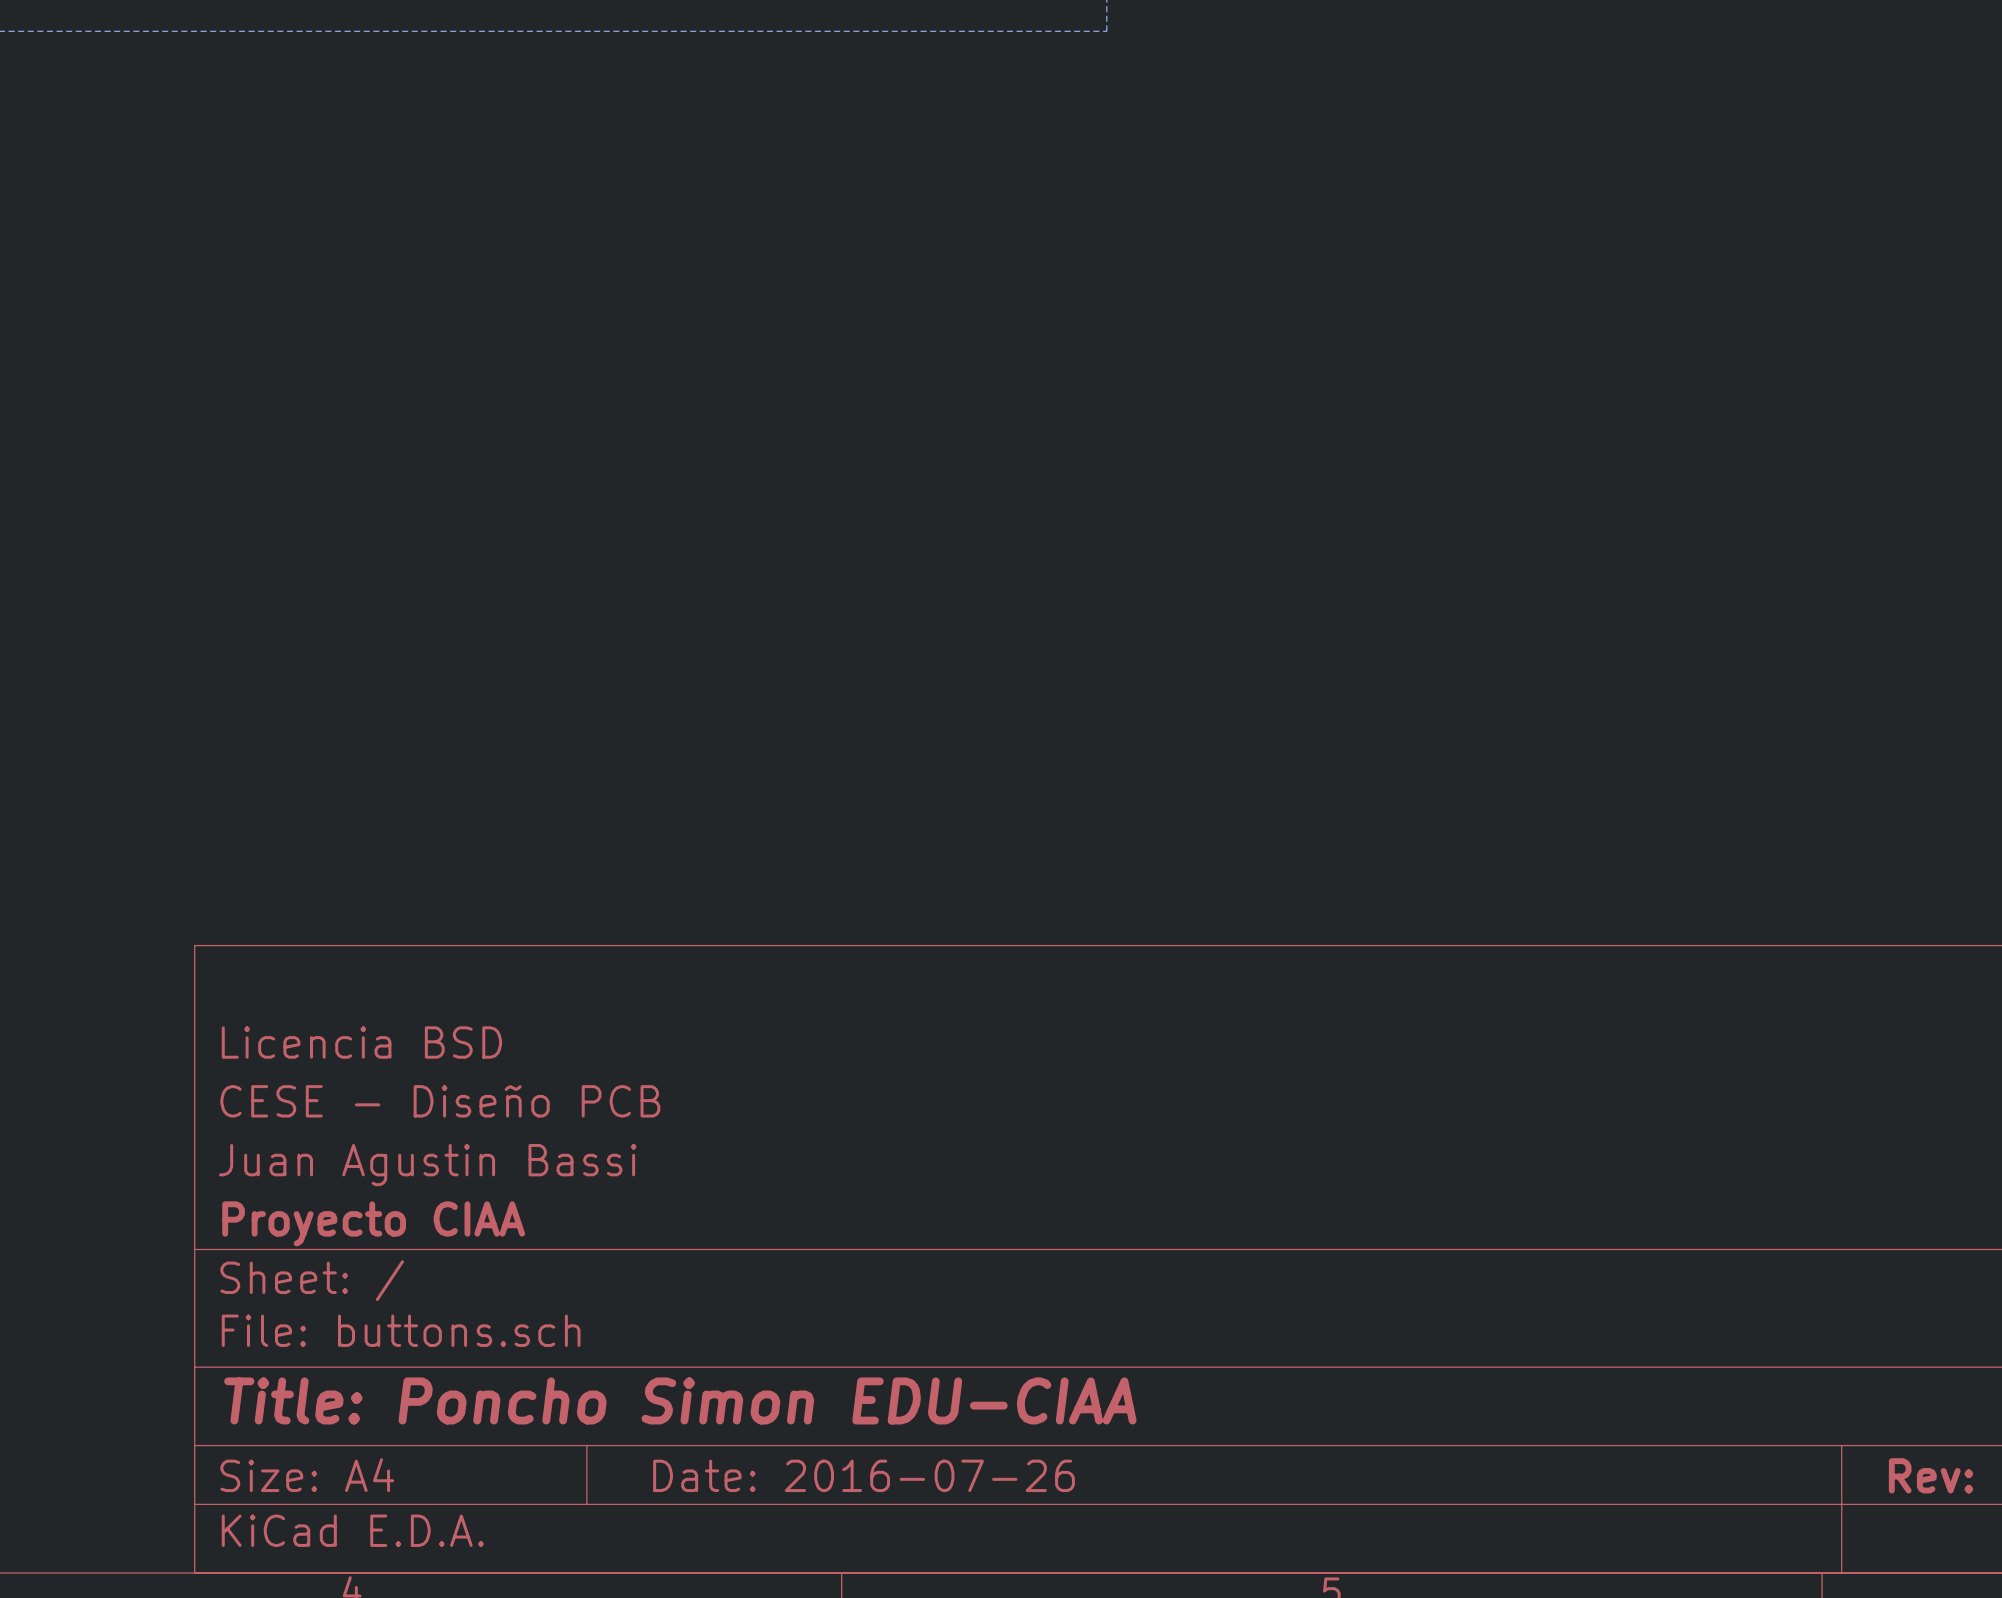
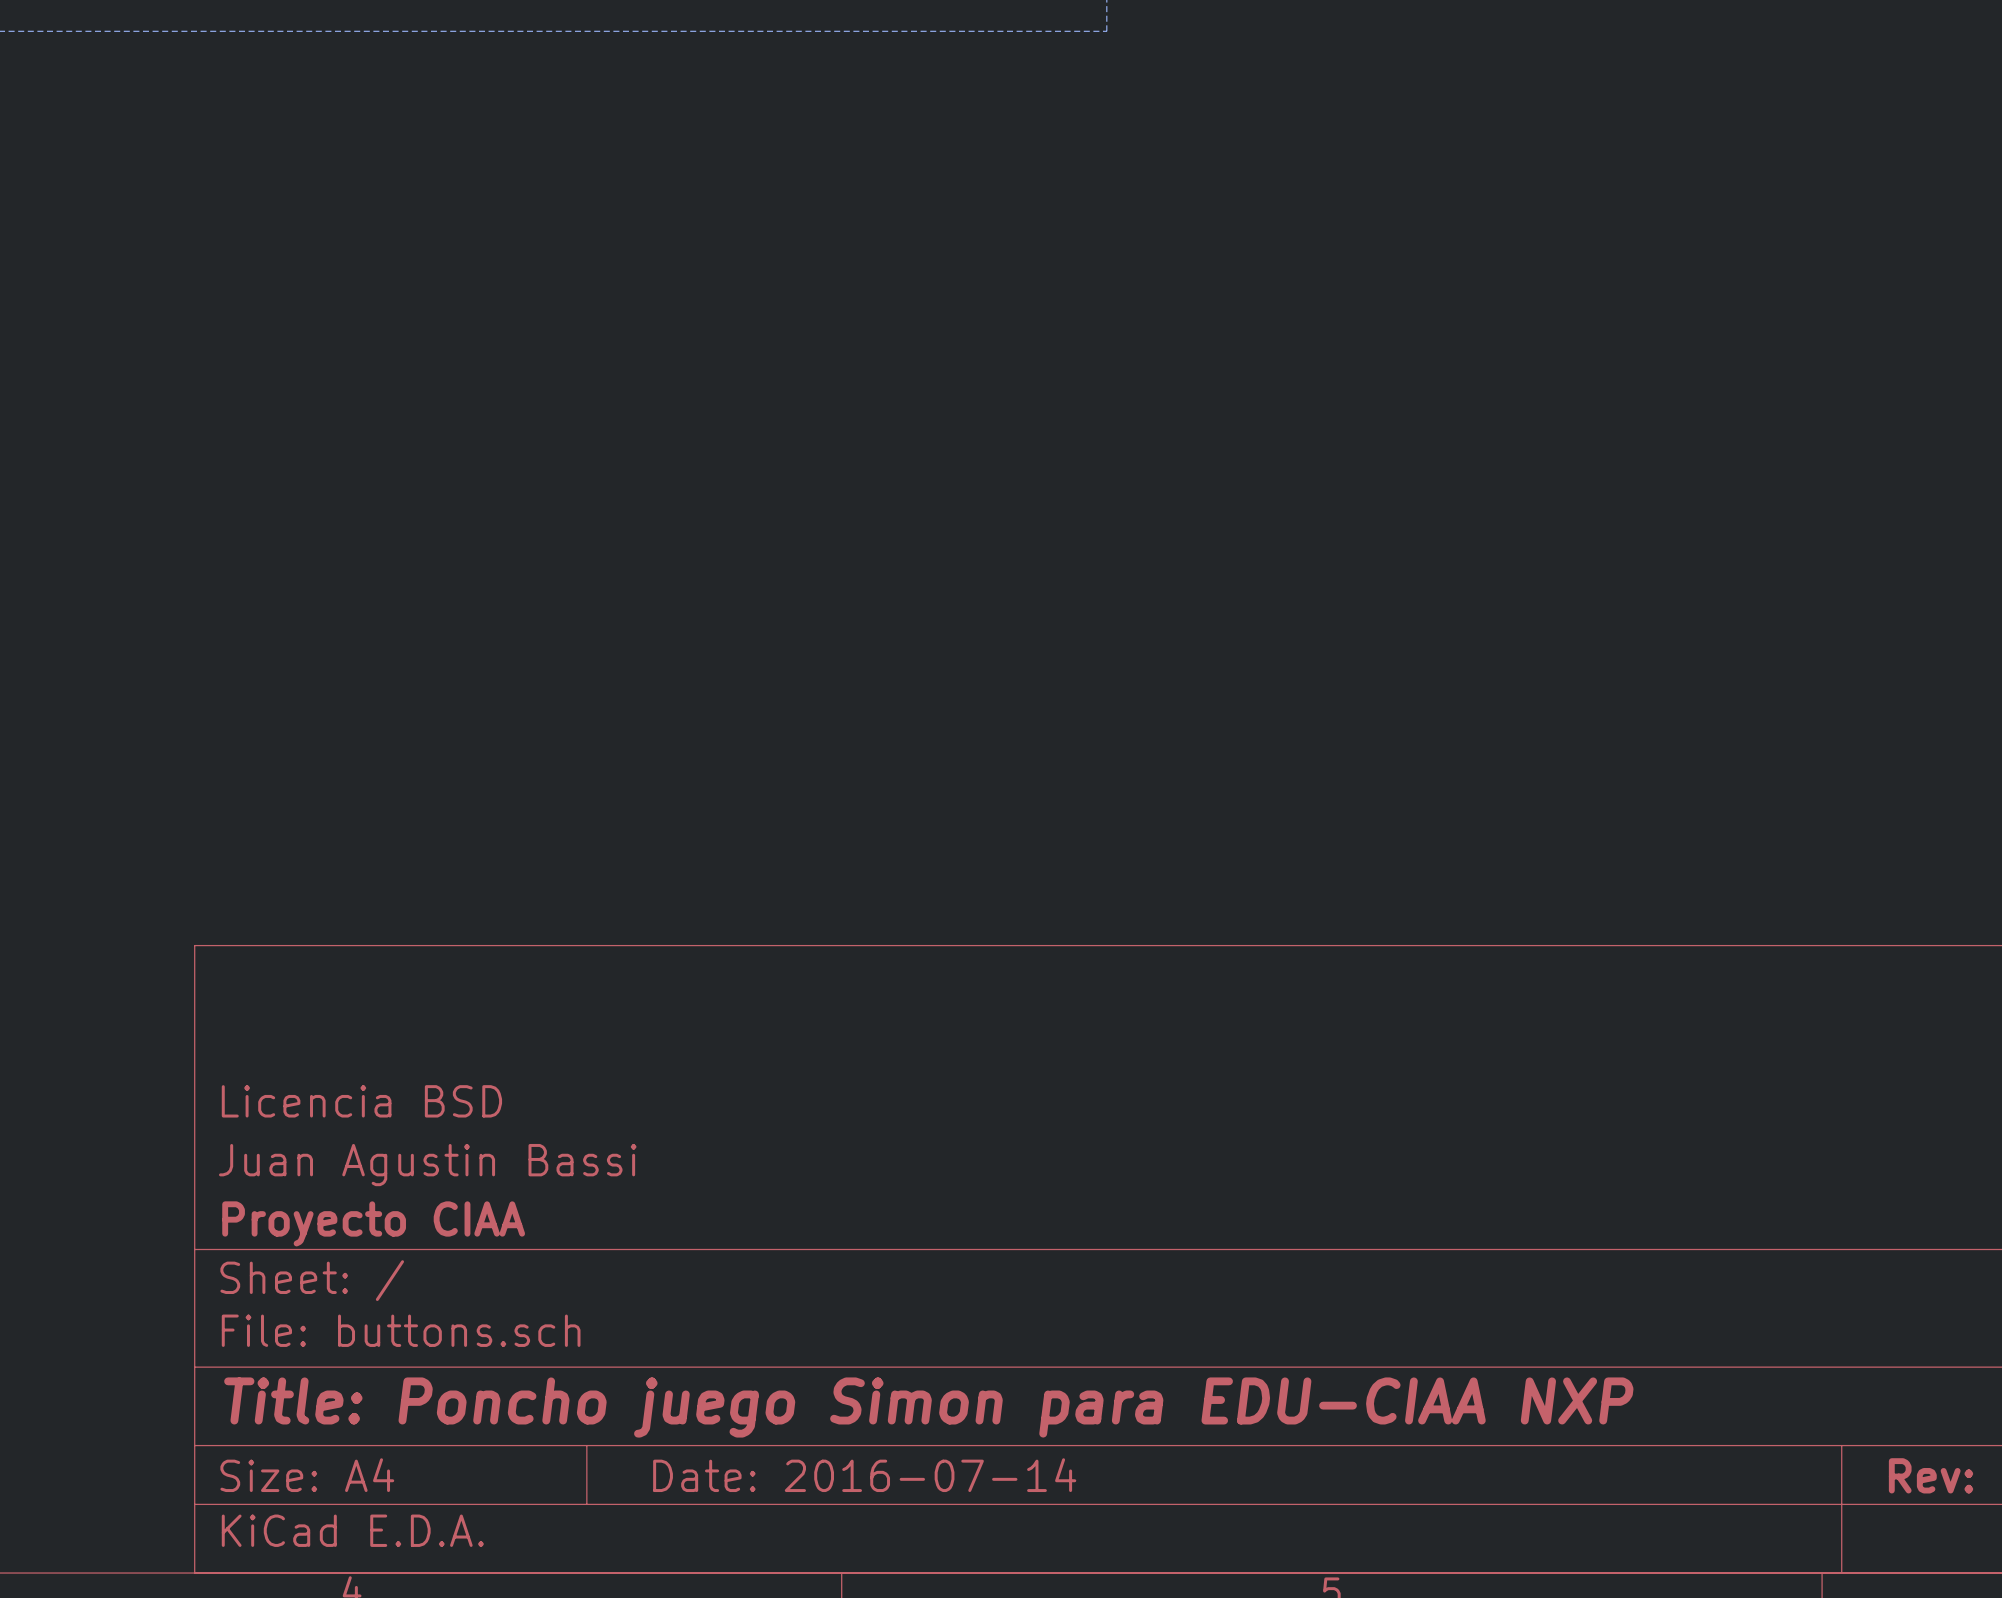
title block: Licencia BSD (361, 1042) -> none
title block: CESE - Diseño PCB (440, 1101) -> Licencia BSD (361, 1101)
title block: Title: Poncho Simon EDU-CIAA (680, 1400) -> Title: Poncho juego Simon para EDU-CIAA NXP (928, 1407)
title block: Date: 2016-07-26 (864, 1475) -> Date: 2016-07-14 (864, 1475)

